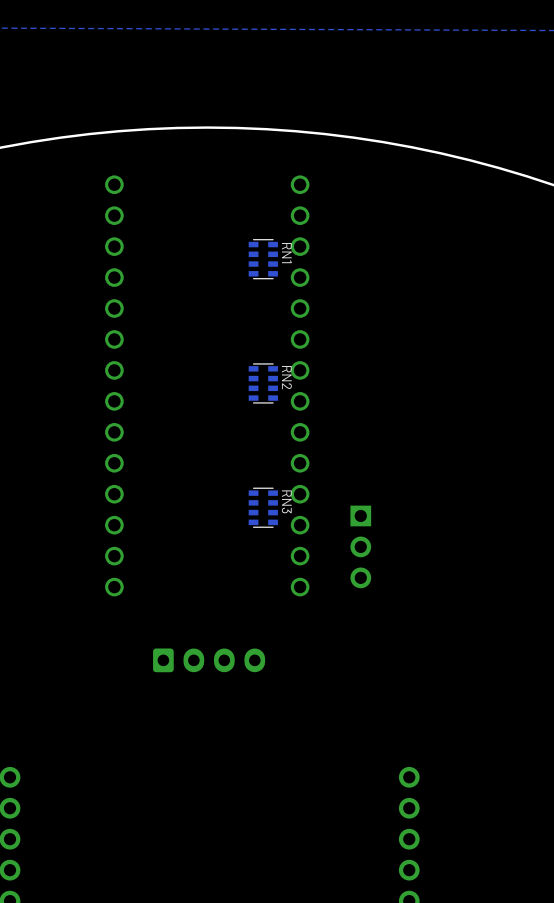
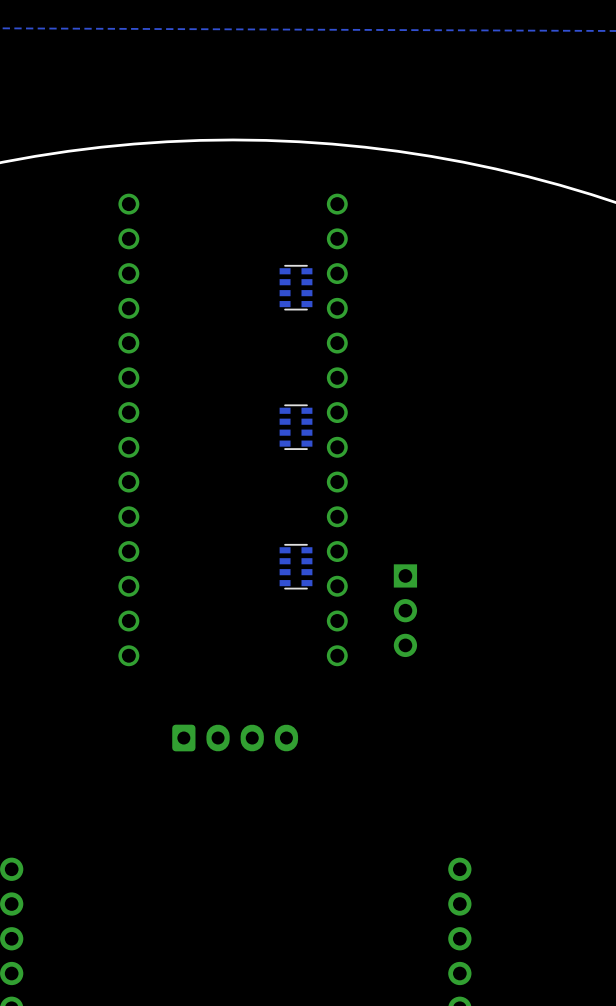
RN1 name: RN1 (286, 253) -> none
RN2 name: RN2 (286, 377) -> none
RN3 name: RN3 (286, 501) -> none

